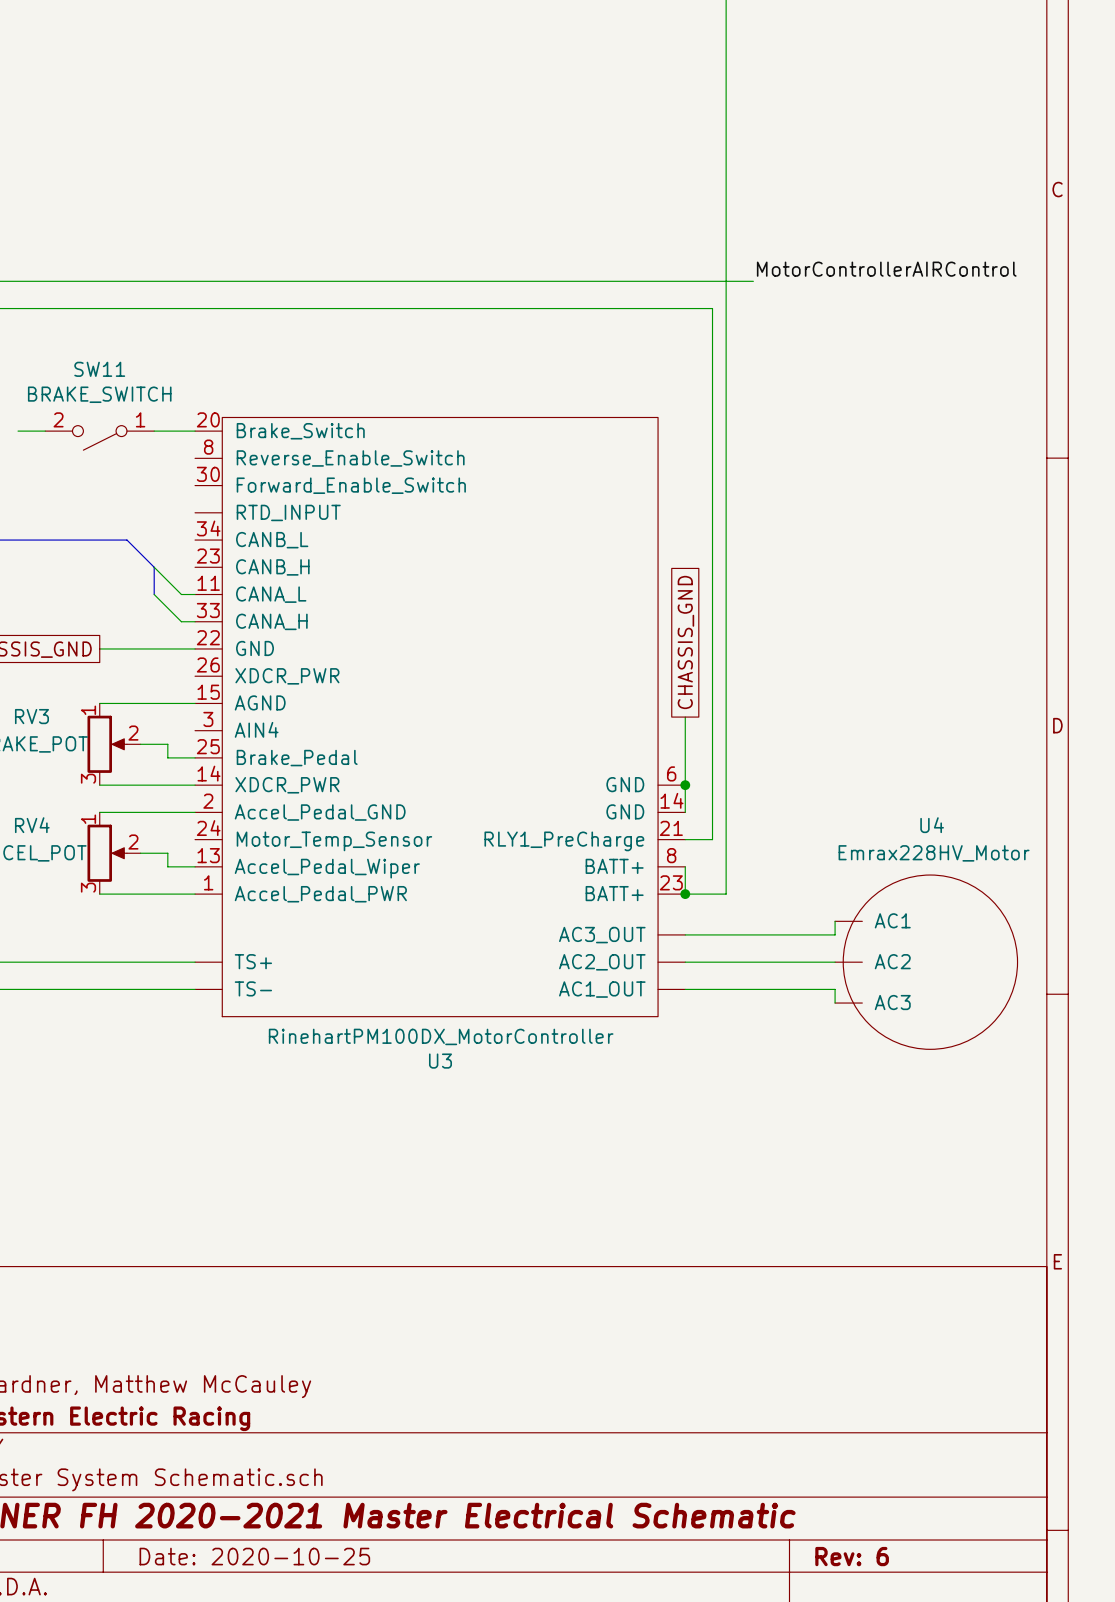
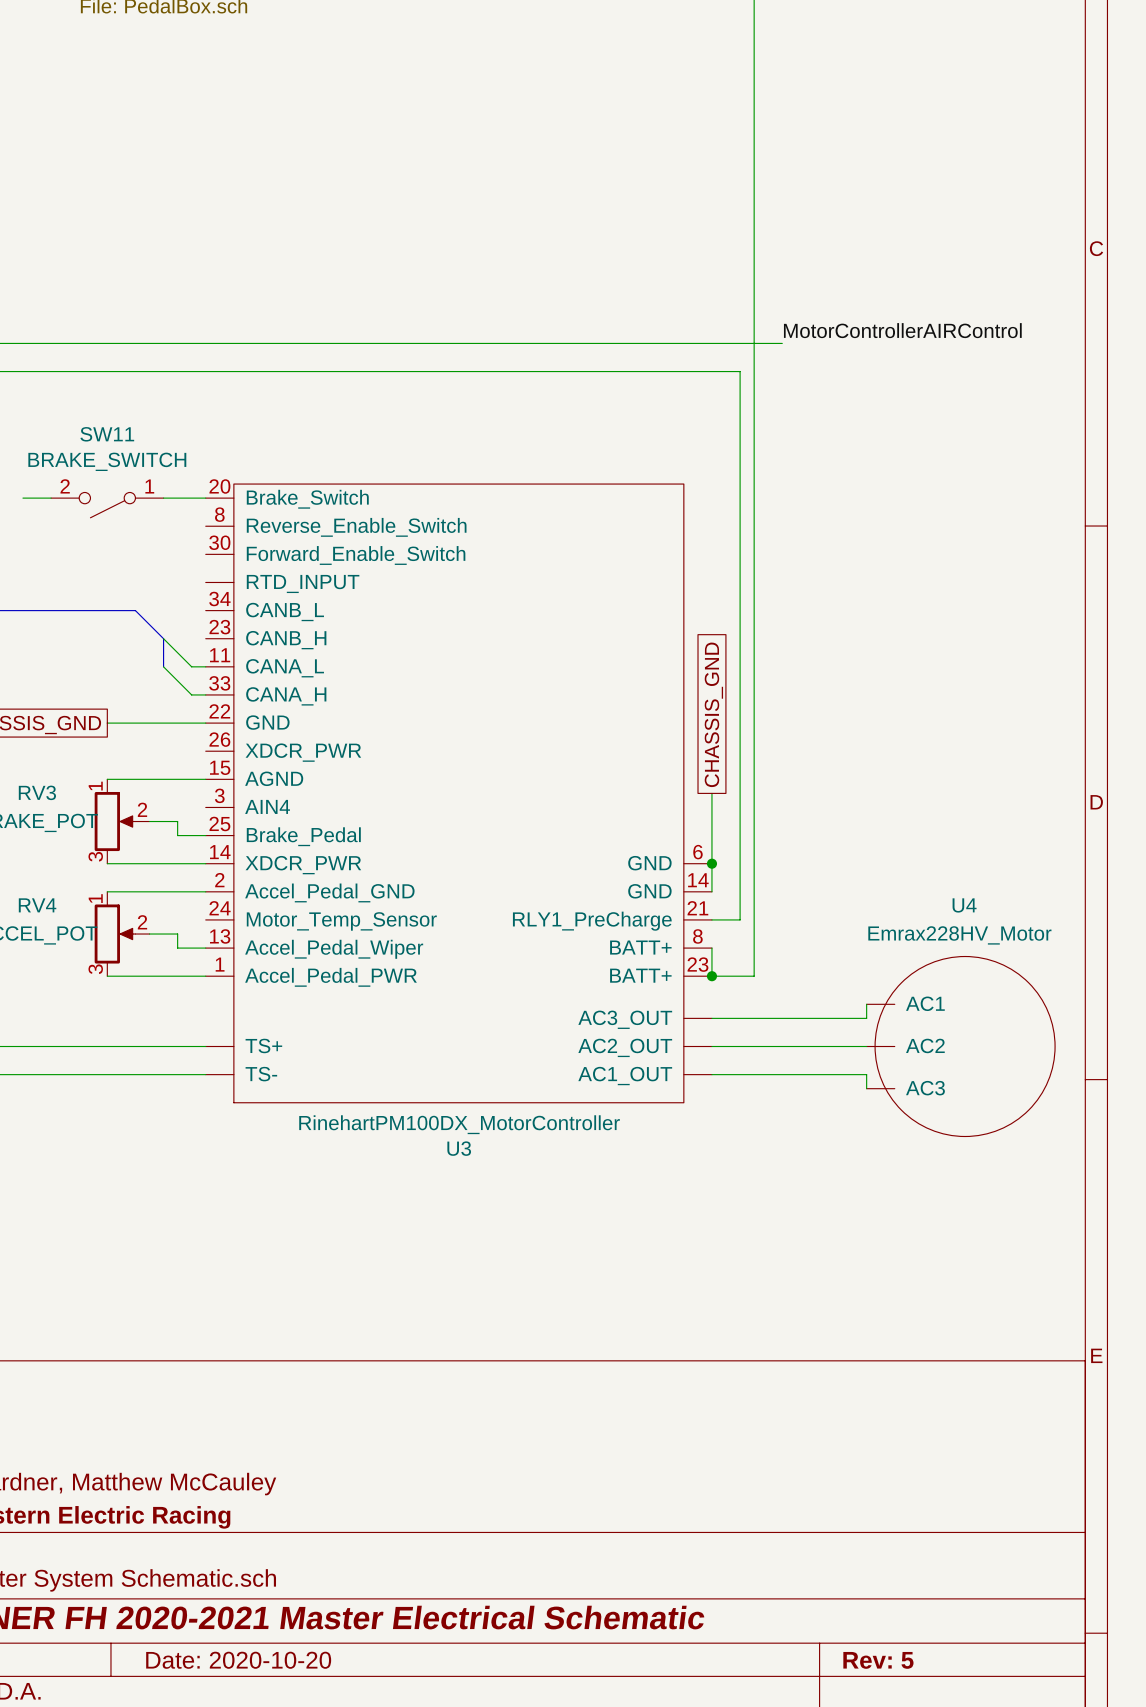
title block: Date: 2020-10-25 (254, 1556) -> Date: 2020-10-20 (238, 1660)
title block: Rev: 6 (852, 1556) -> Rev: 5 (878, 1660)

